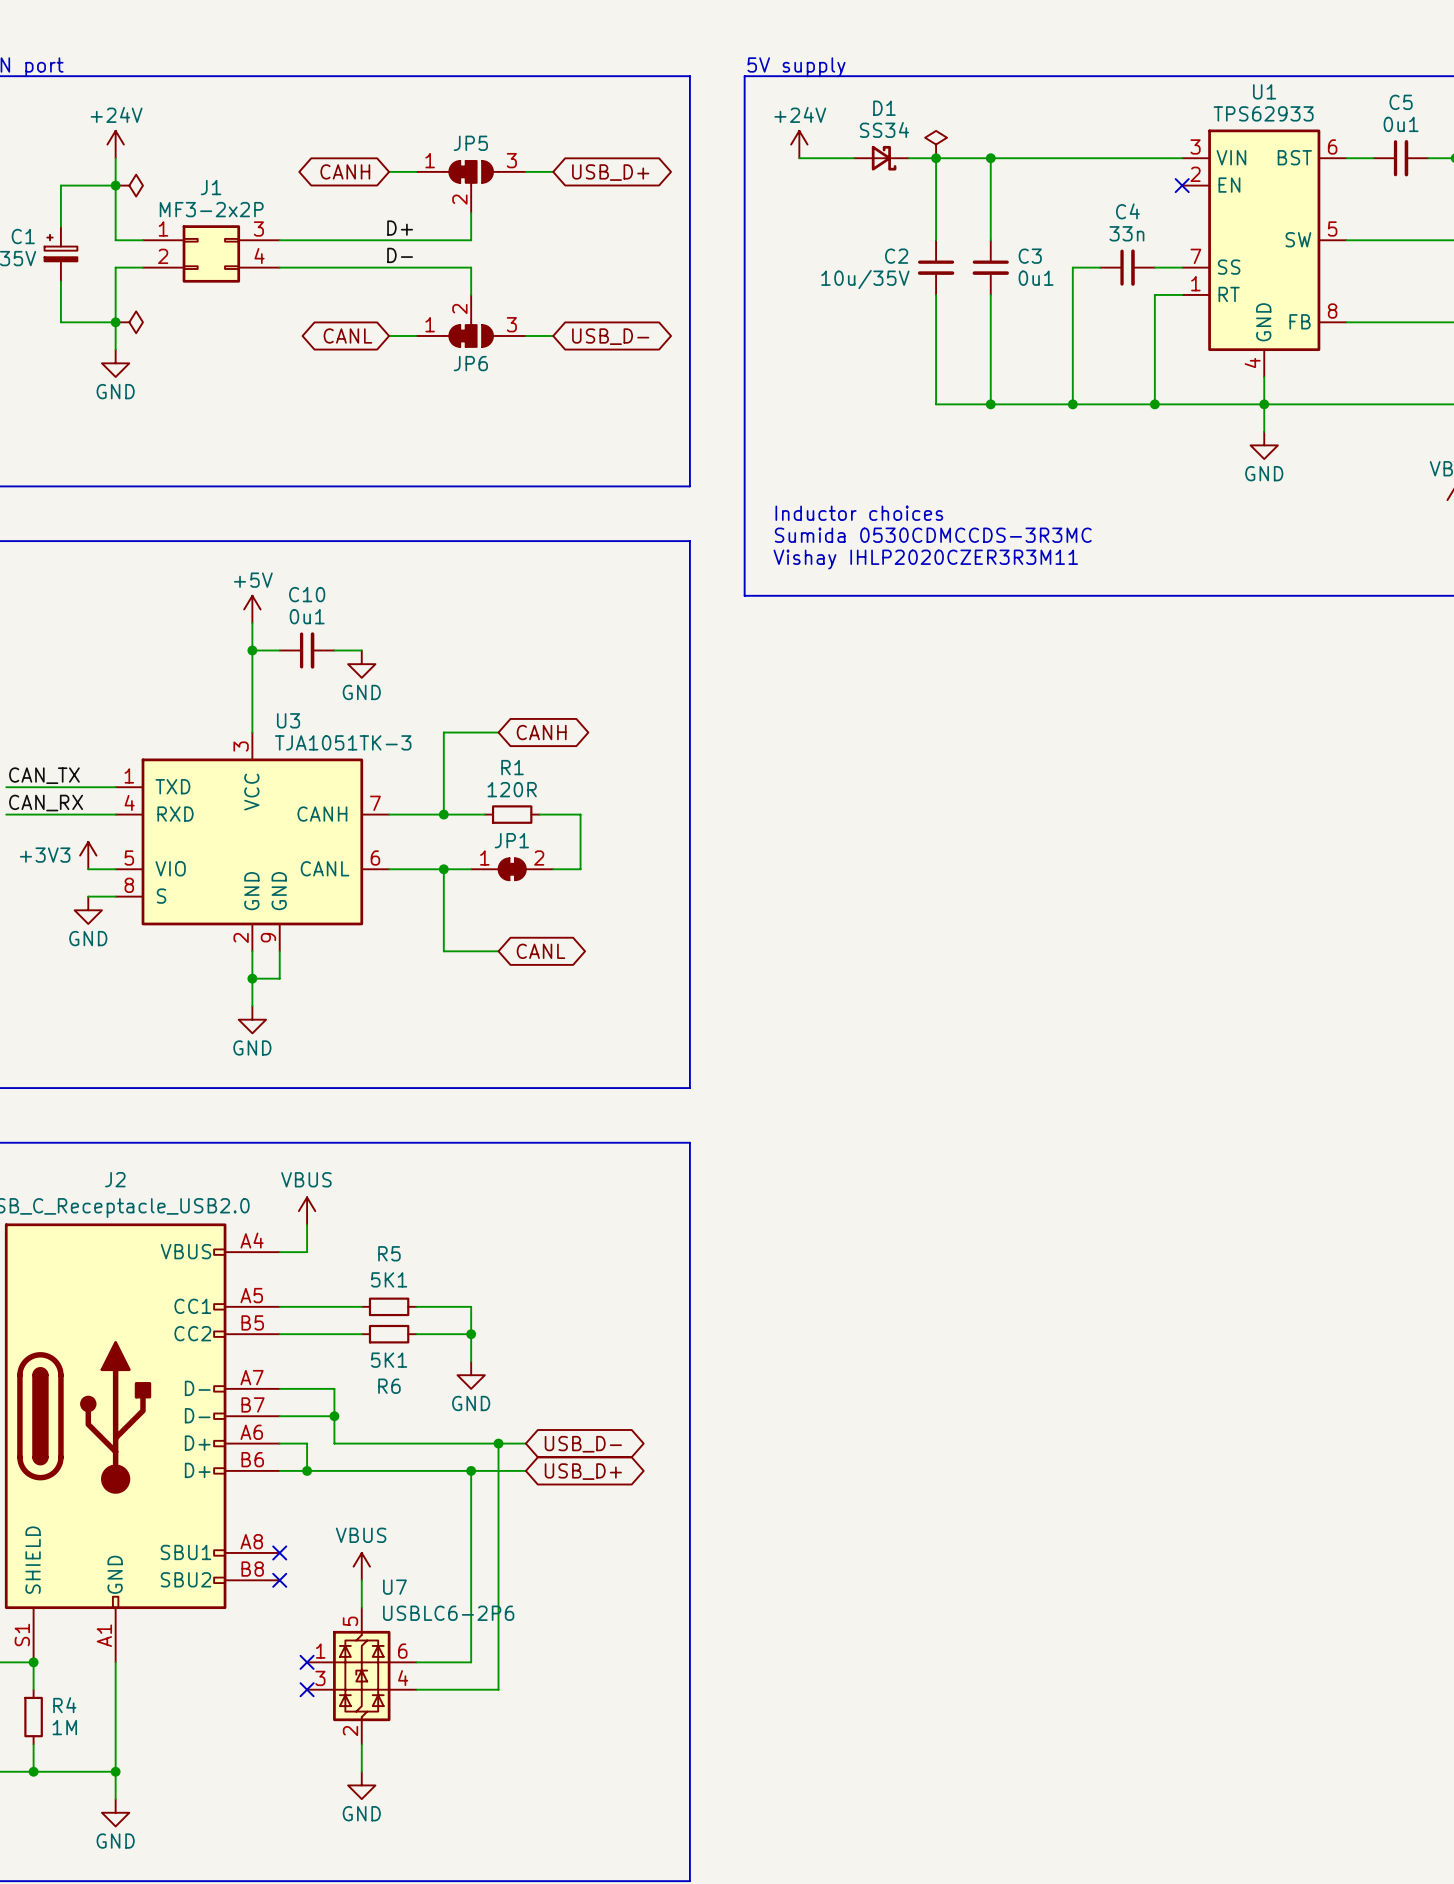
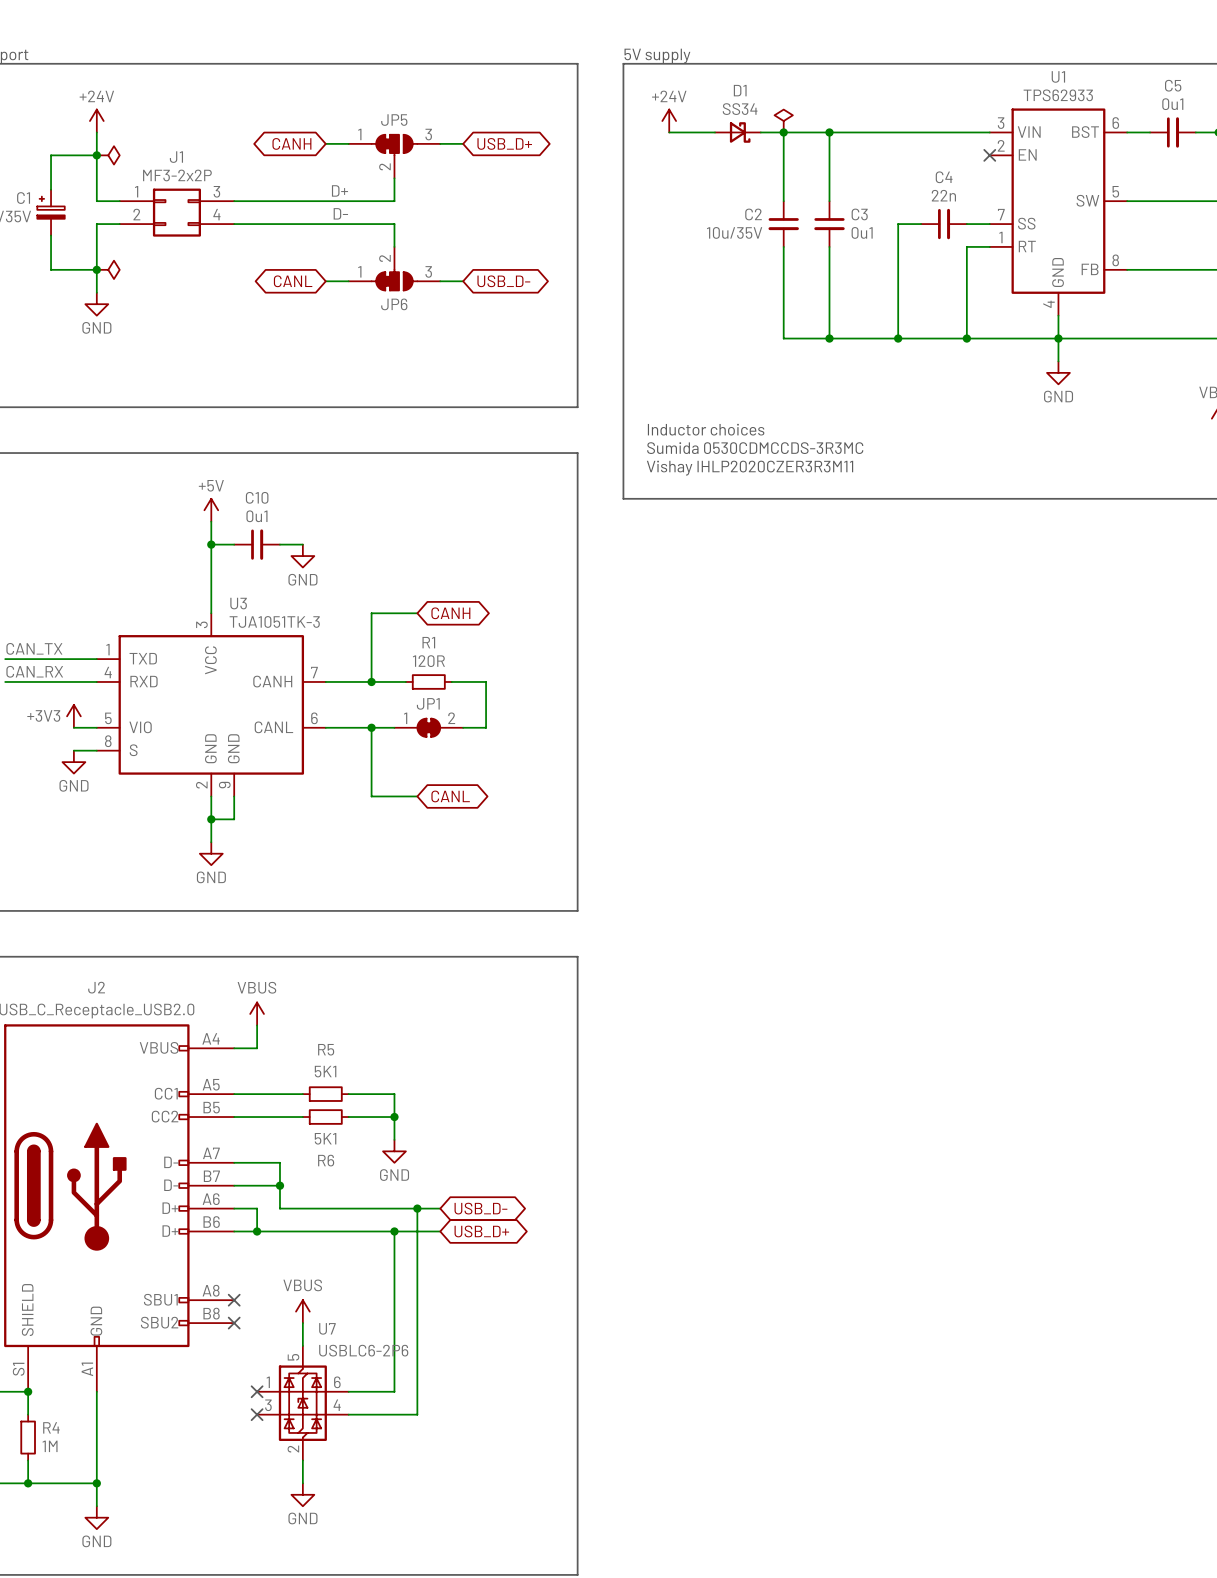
C4 value: 33n (1126, 233) -> 22n (943, 195)

